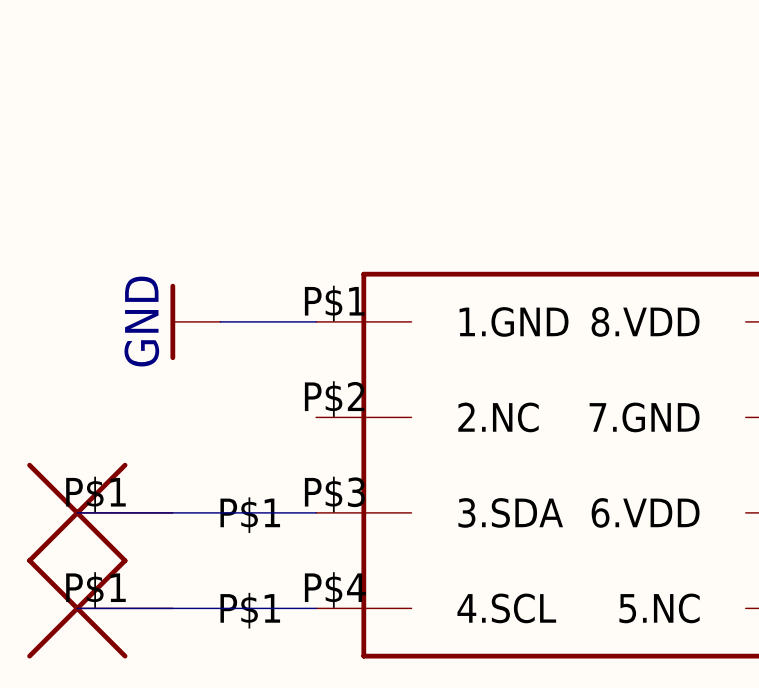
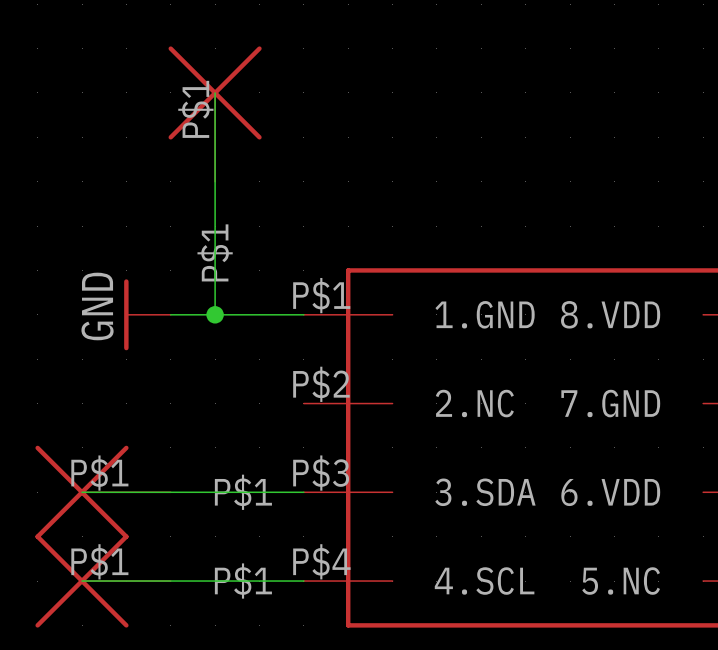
wire: none -> (215, 92) (215, 314) (170, 314)
part: none -> (215, 114)
power symbol position: GND (195, 321) -> GND (147, 314)
junction: none -> (215, 314)

